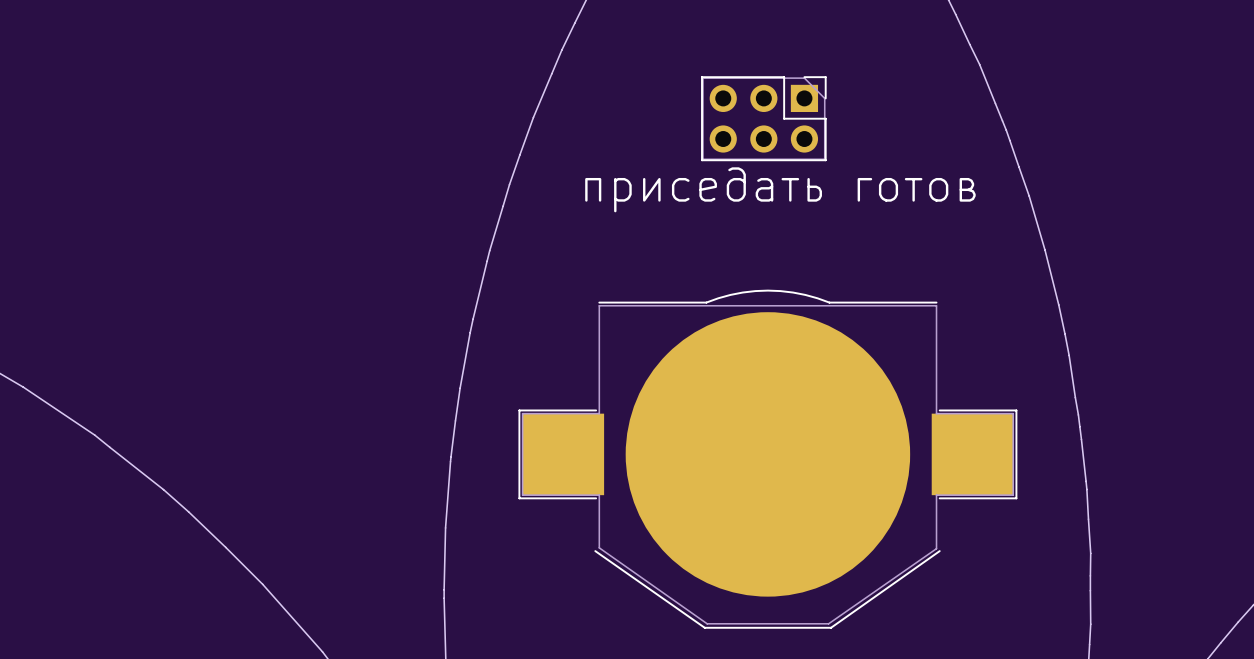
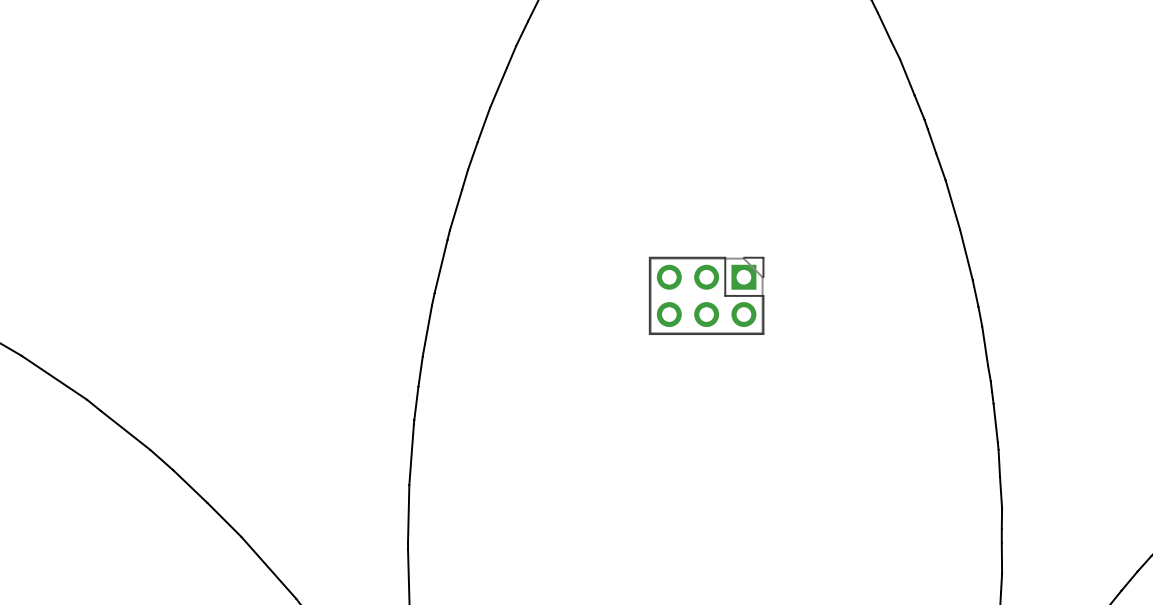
part position: (763, 118) -> (706, 295)
text: приседать готов (780, 189) -> none
part: (767, 459) -> none

